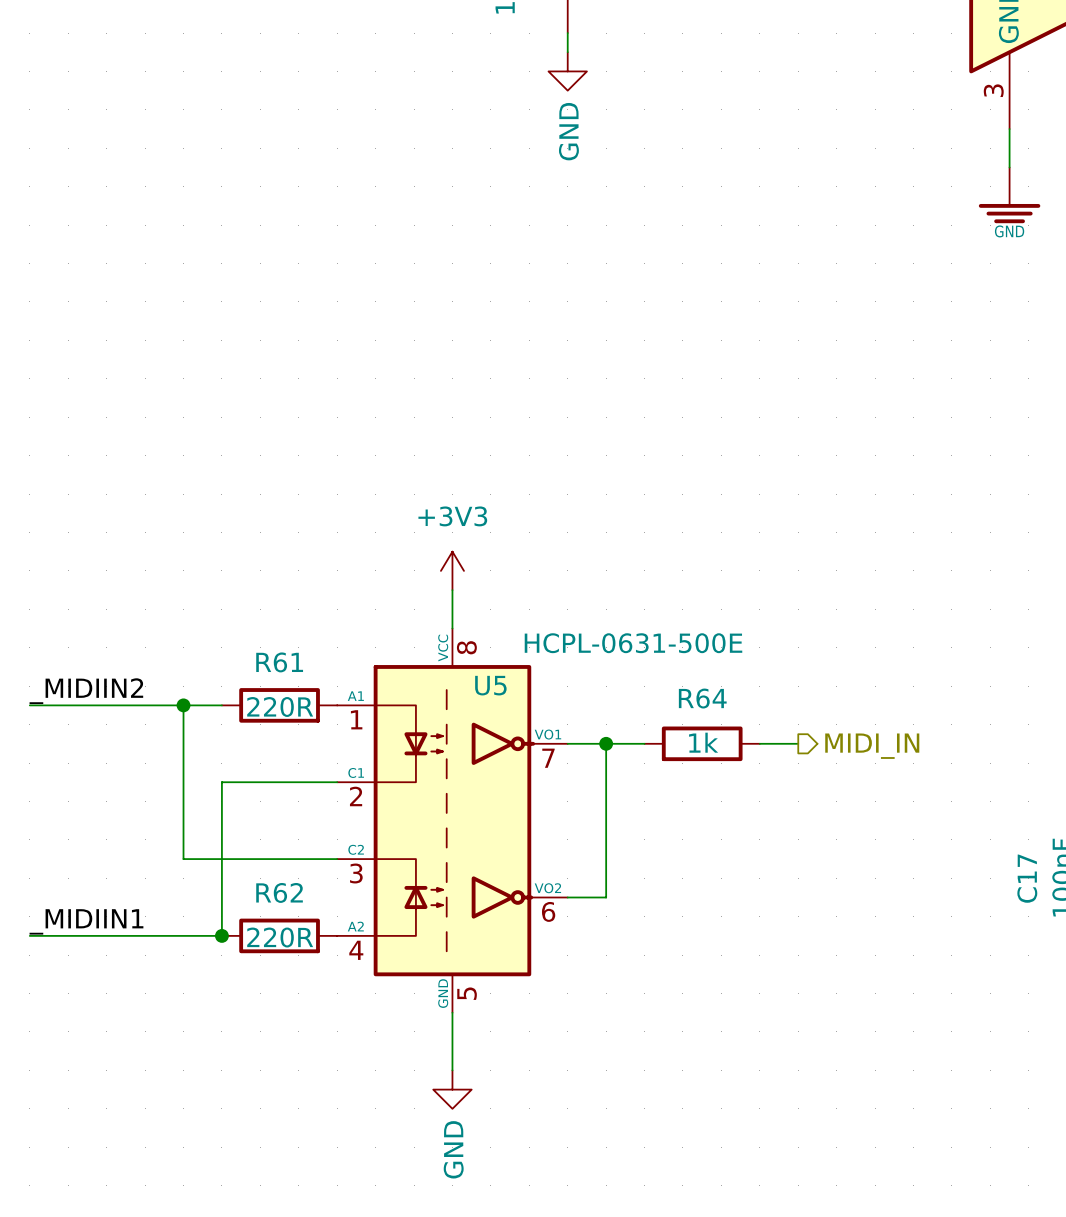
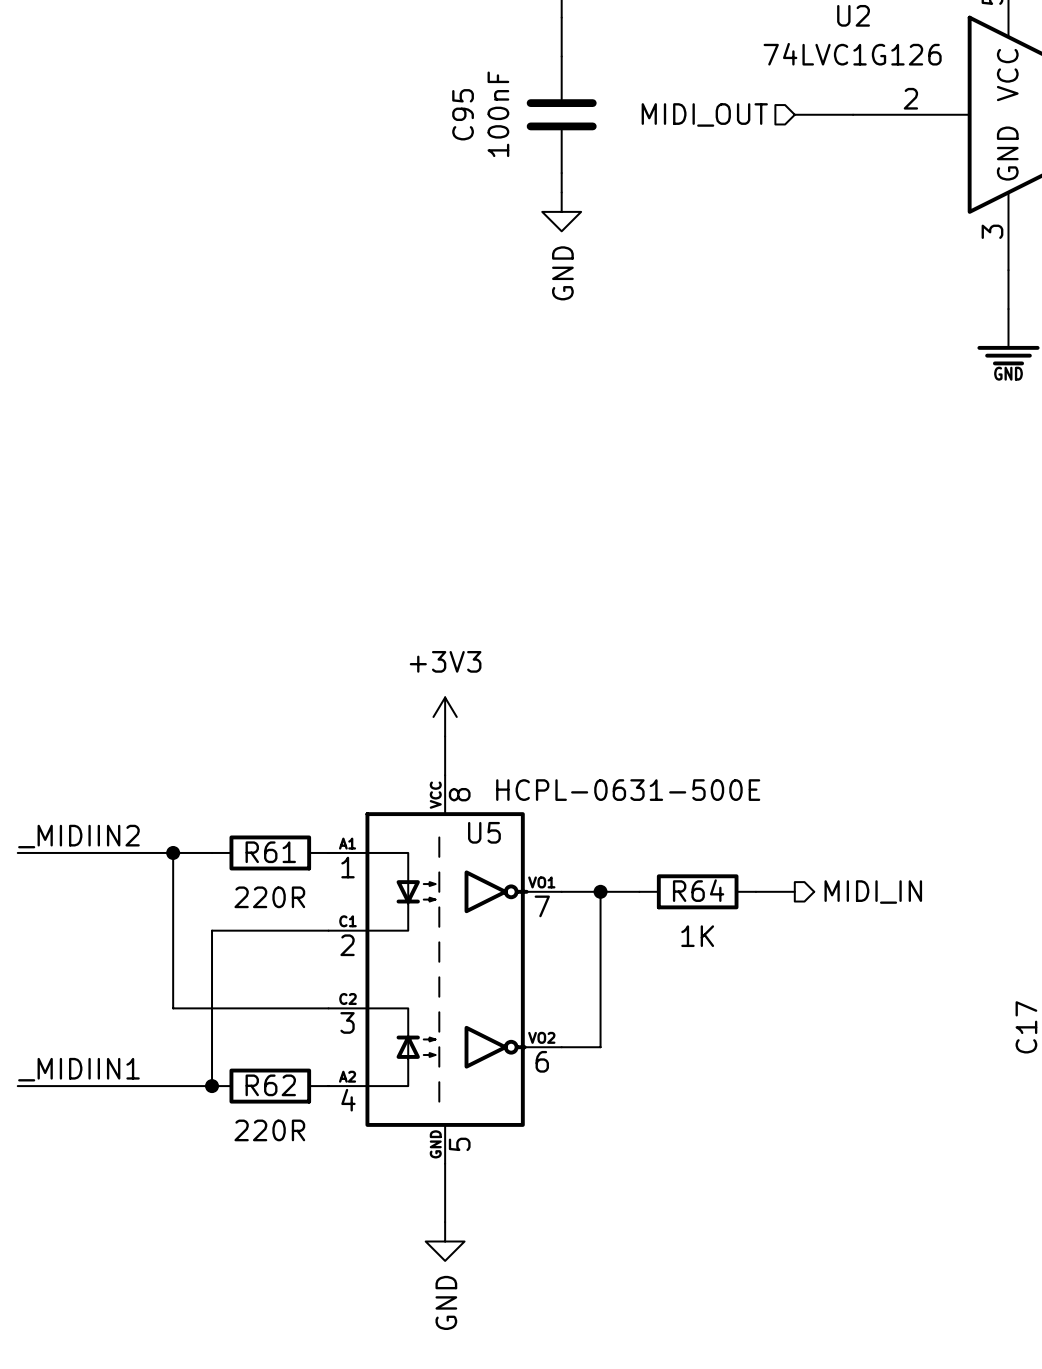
R61 name position: R61 (279, 662) -> R61 (270, 852)
R64 name position: R64 (702, 698) -> R64 (698, 890)
R61 value position: 220R (280, 706) -> 220R (269, 897)
R64 value: 1k (703, 742) -> 1K (697, 936)
R62 name position: R62 (279, 892) -> R62 (270, 1085)
R62 value position: 220R (280, 937) -> 220R (269, 1130)

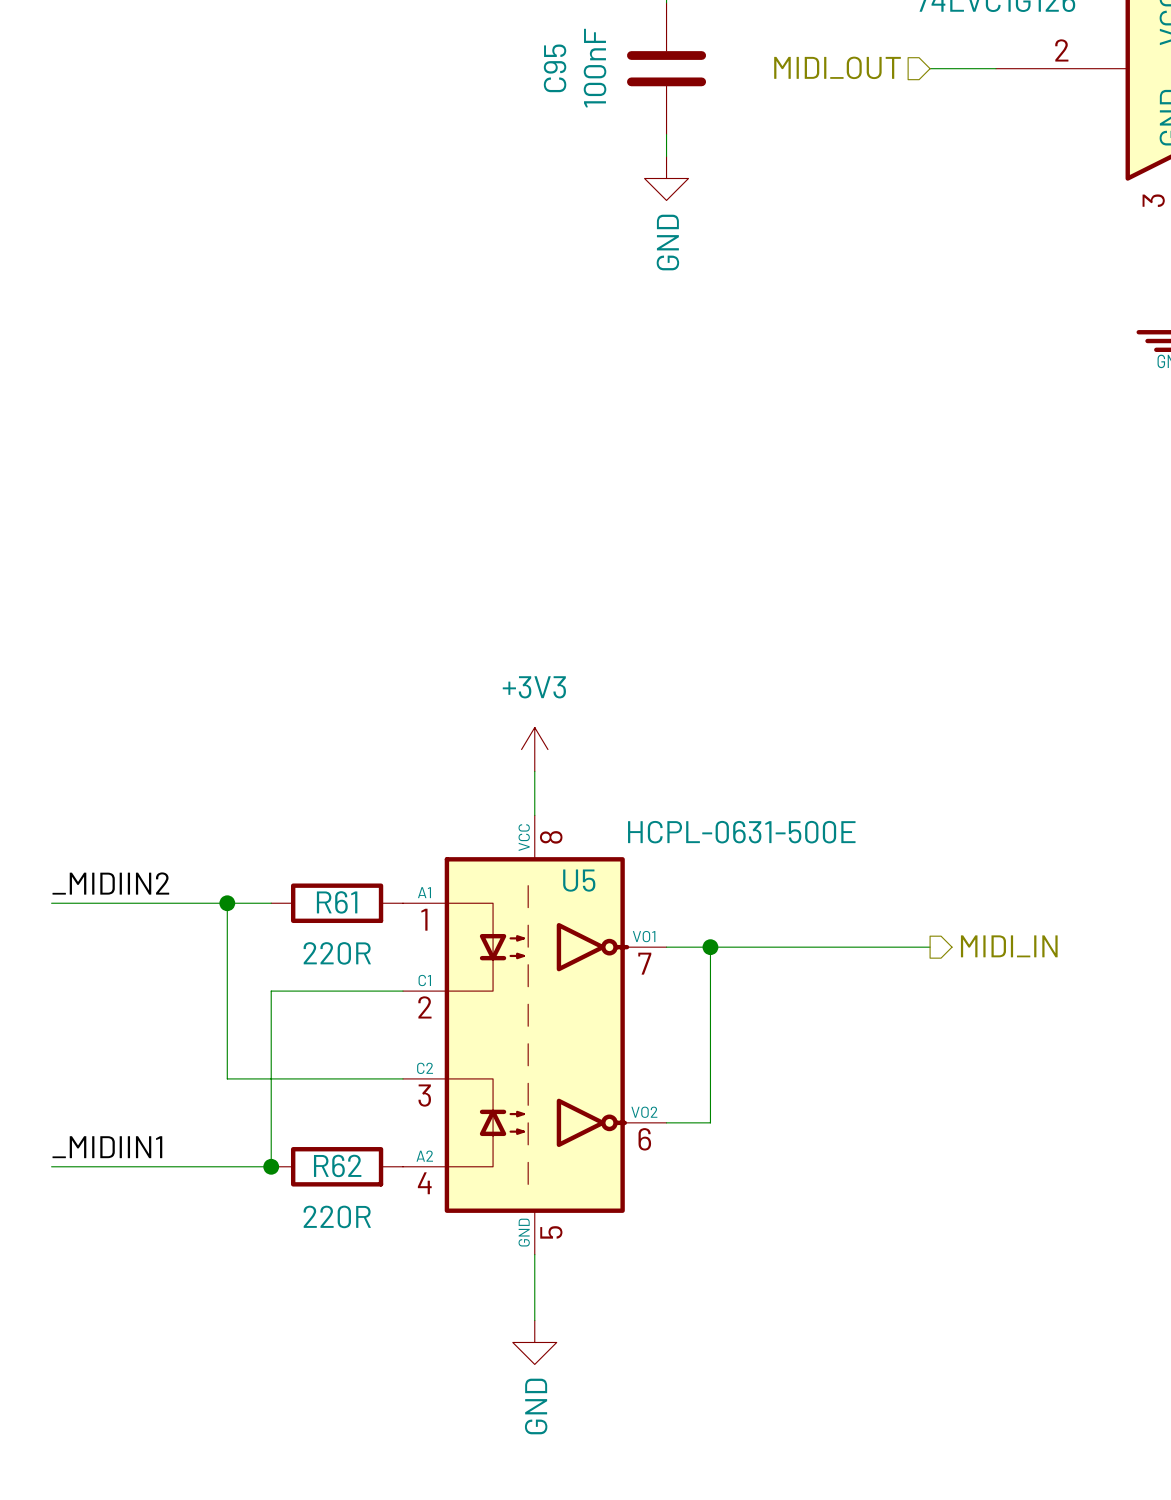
wire: none -> (754, 947) (886, 947)
R64: 1K (697, 891) -> none

